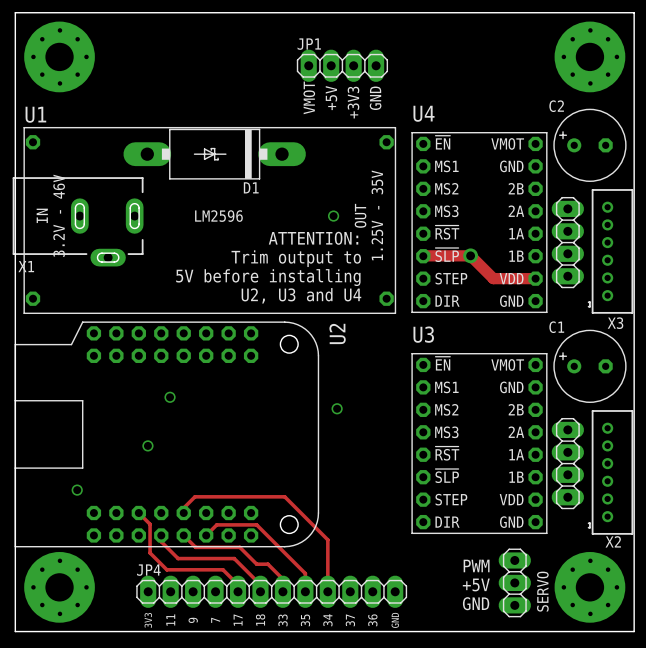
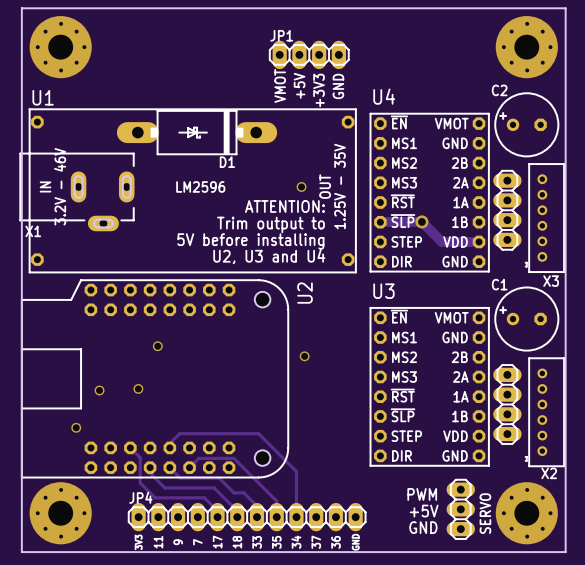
via: none -> (99, 390)

